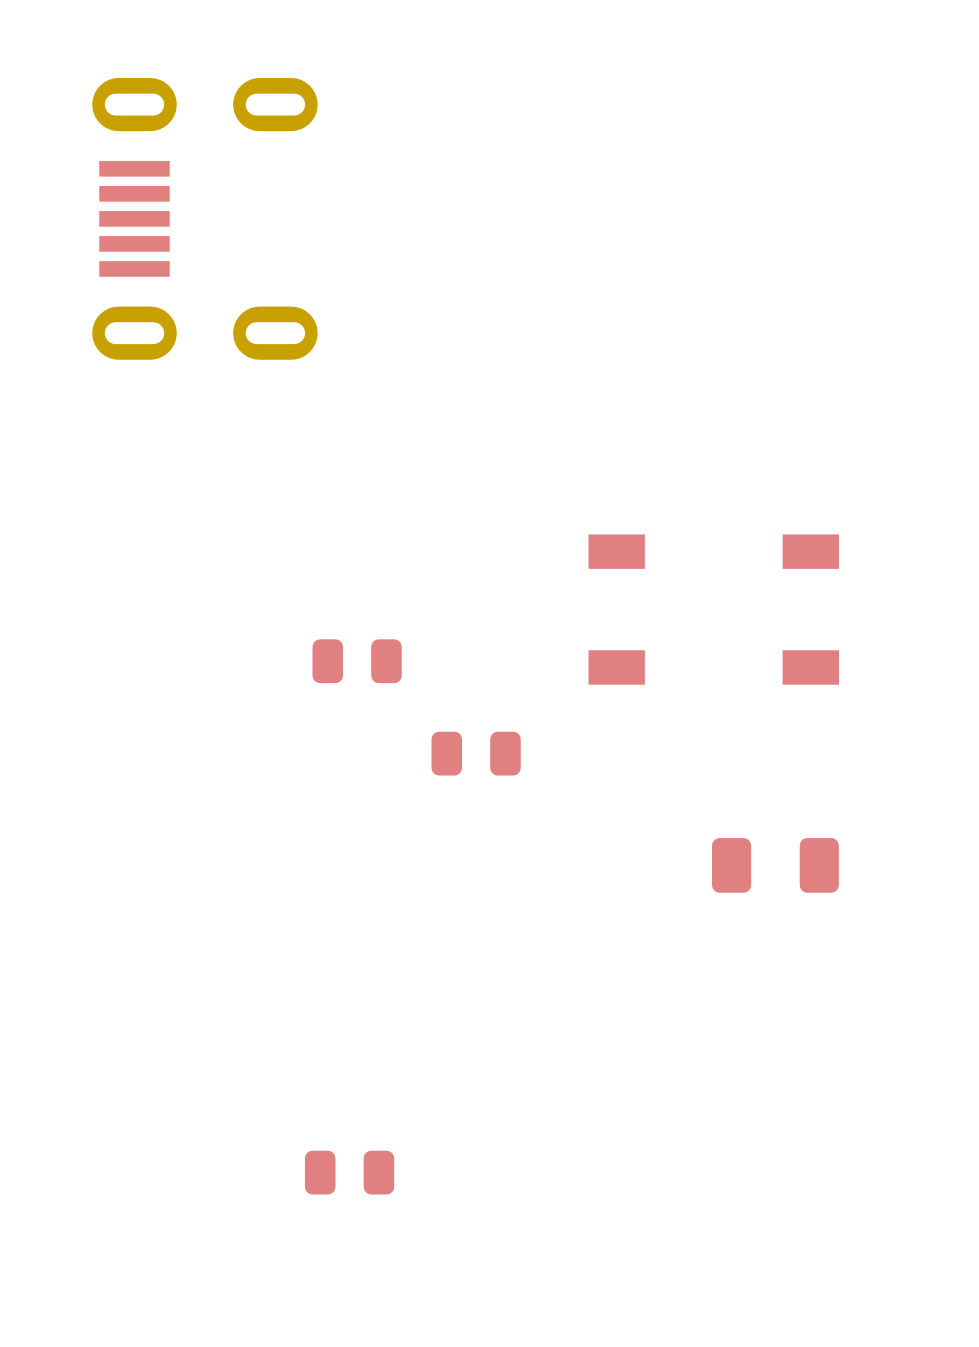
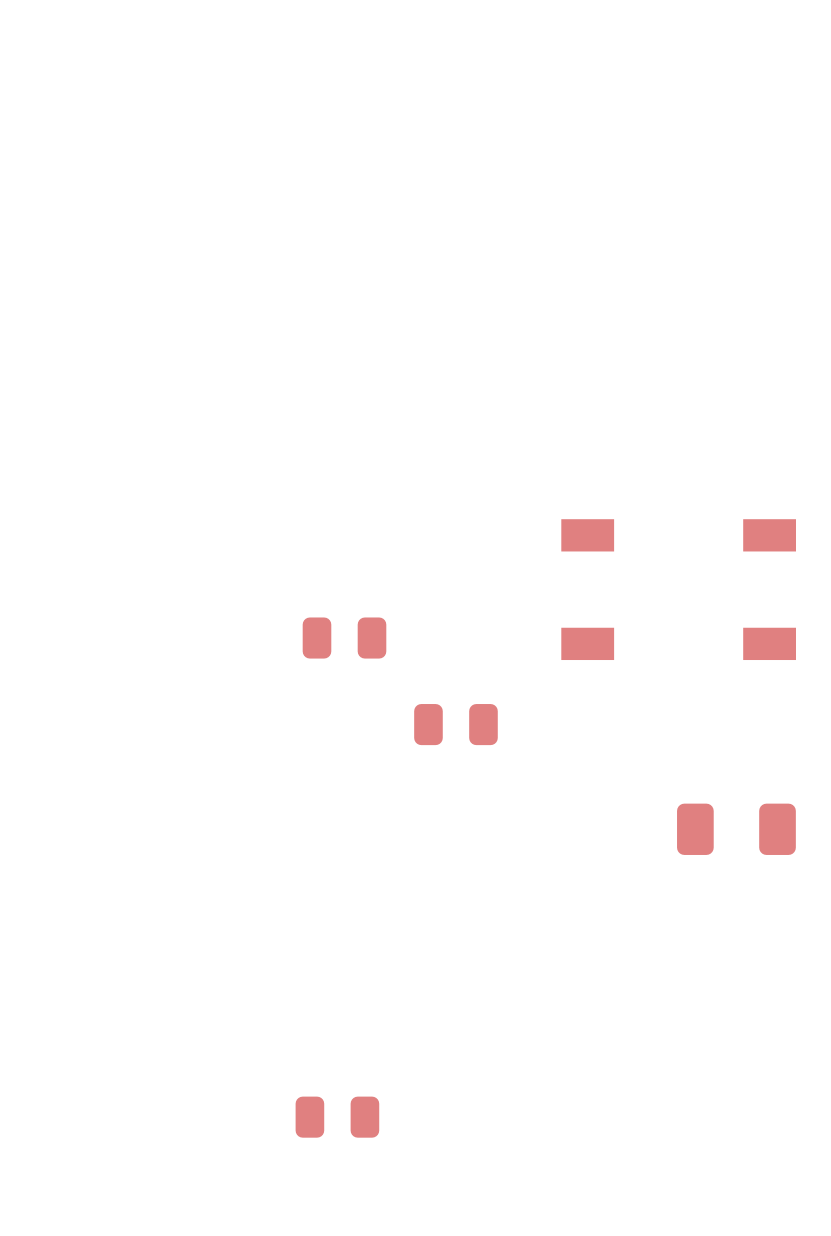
part: (204, 218) -> none

